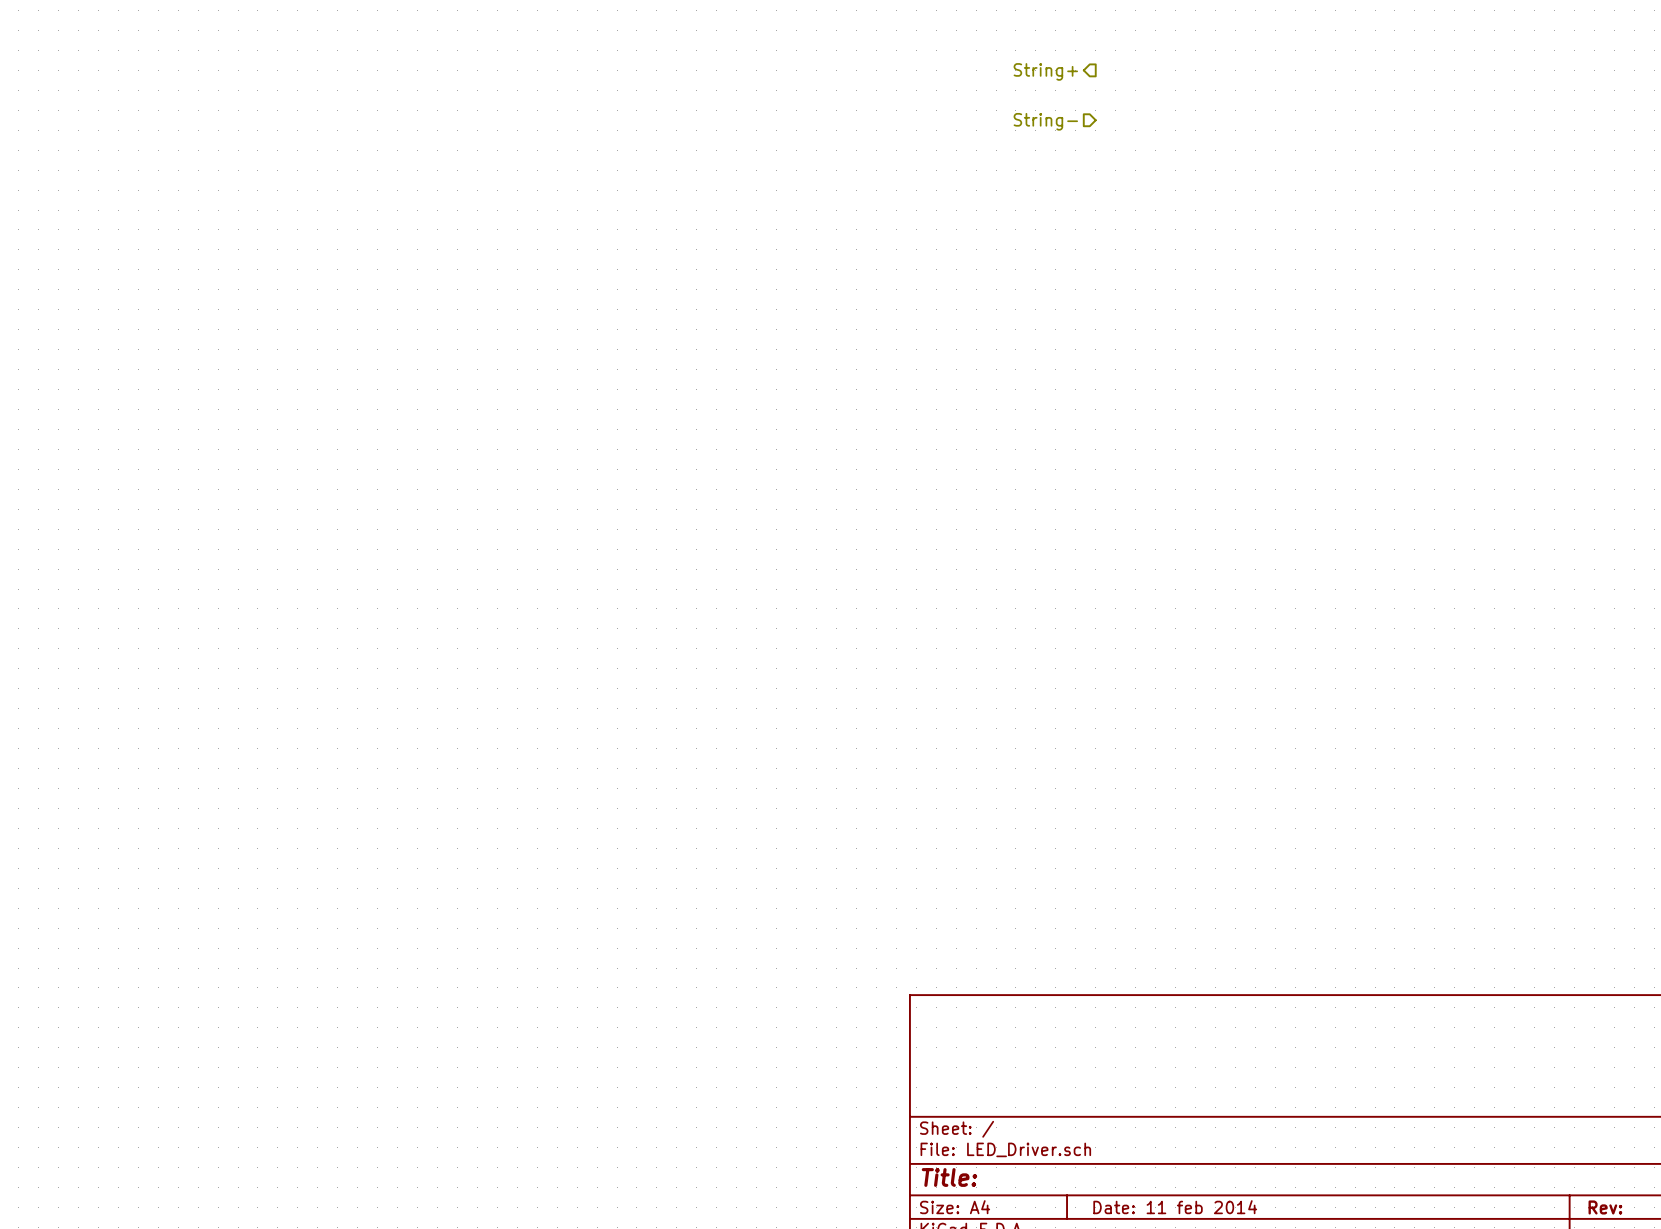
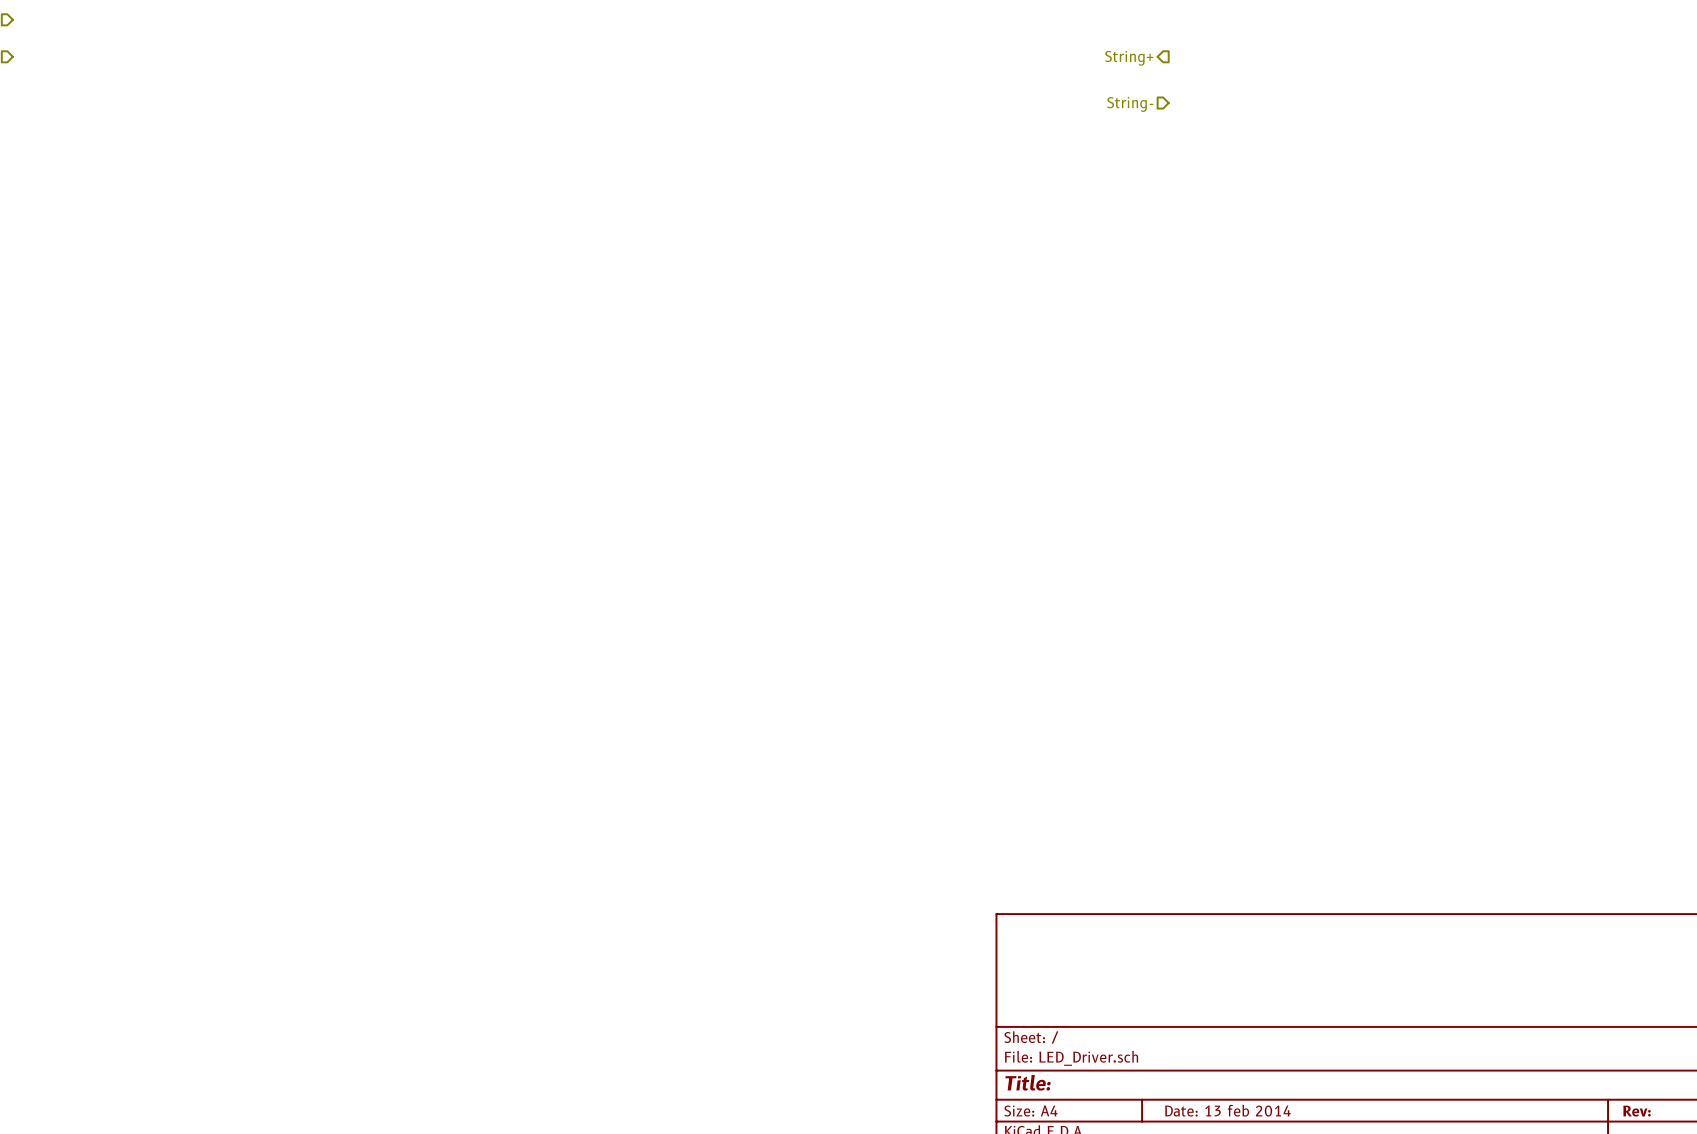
title block: Date: 11 feb 2014 (1175, 1207) -> Date: 13 feb 2014 (1227, 1110)

